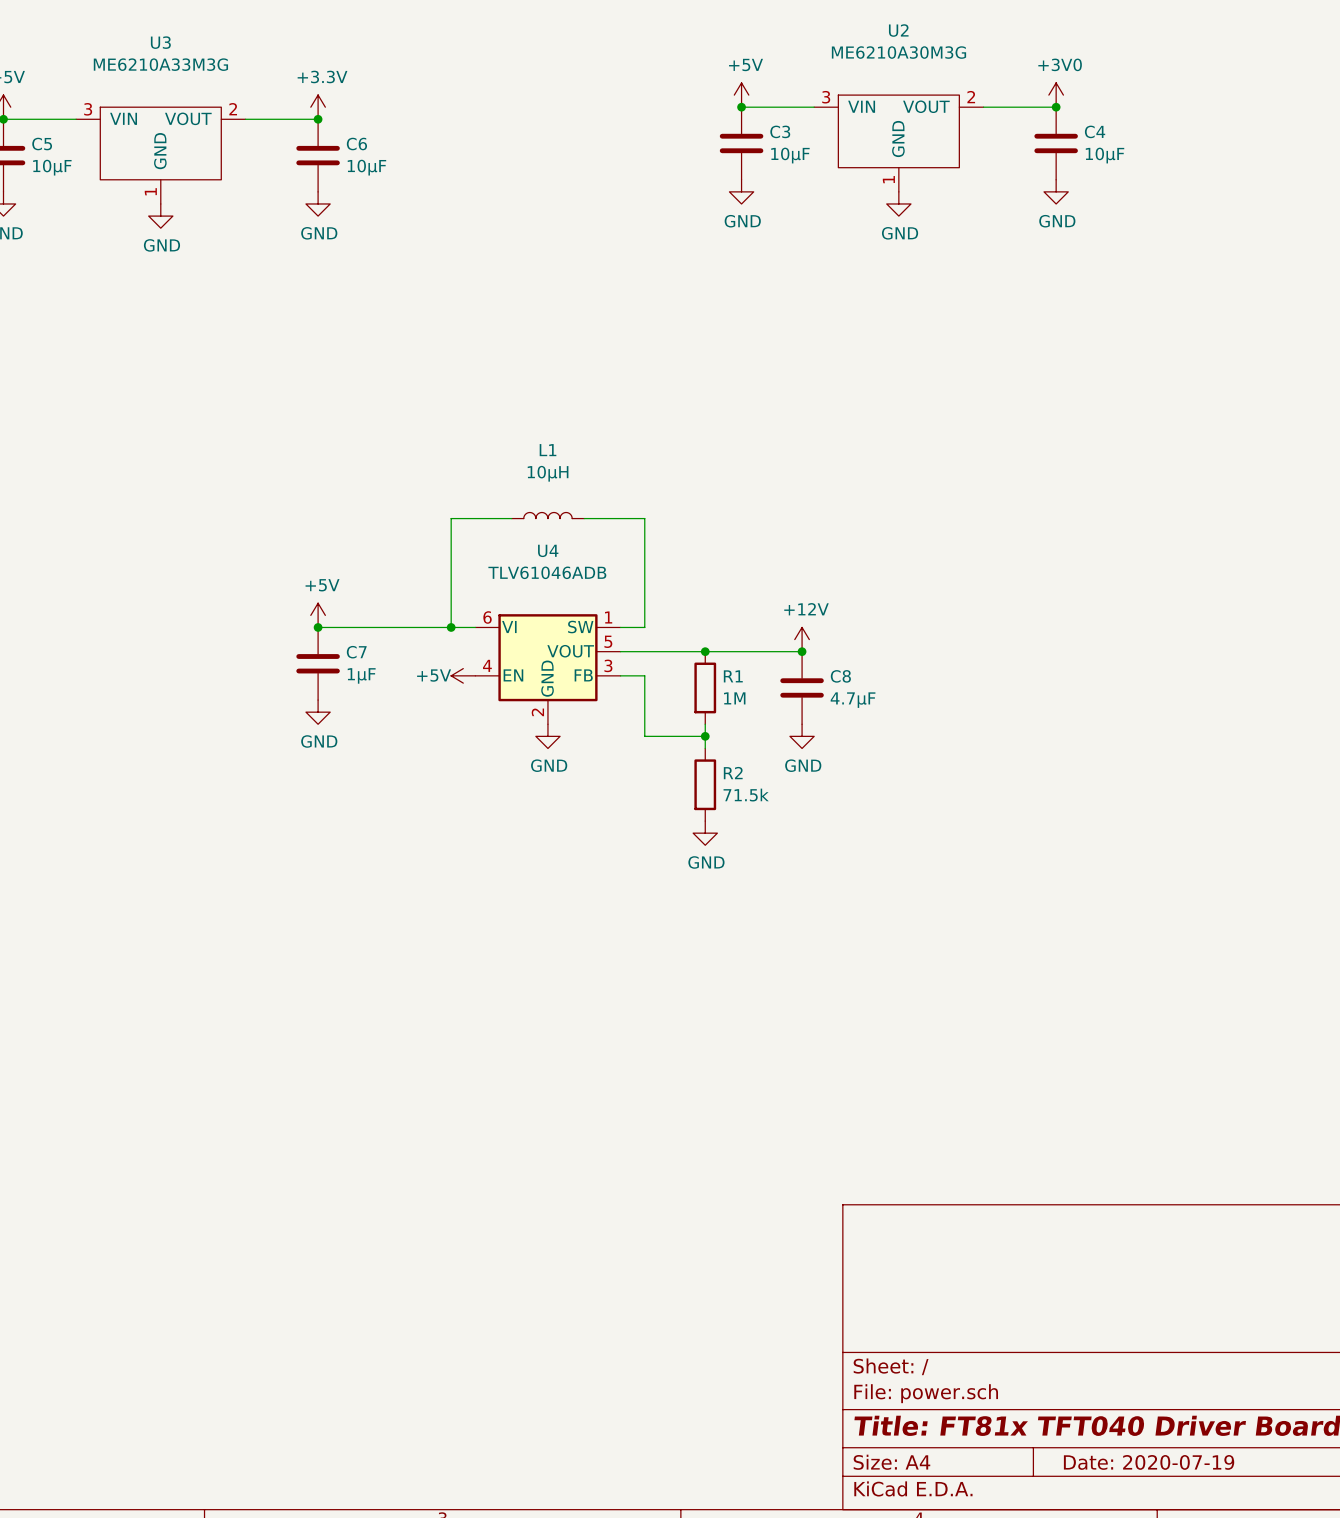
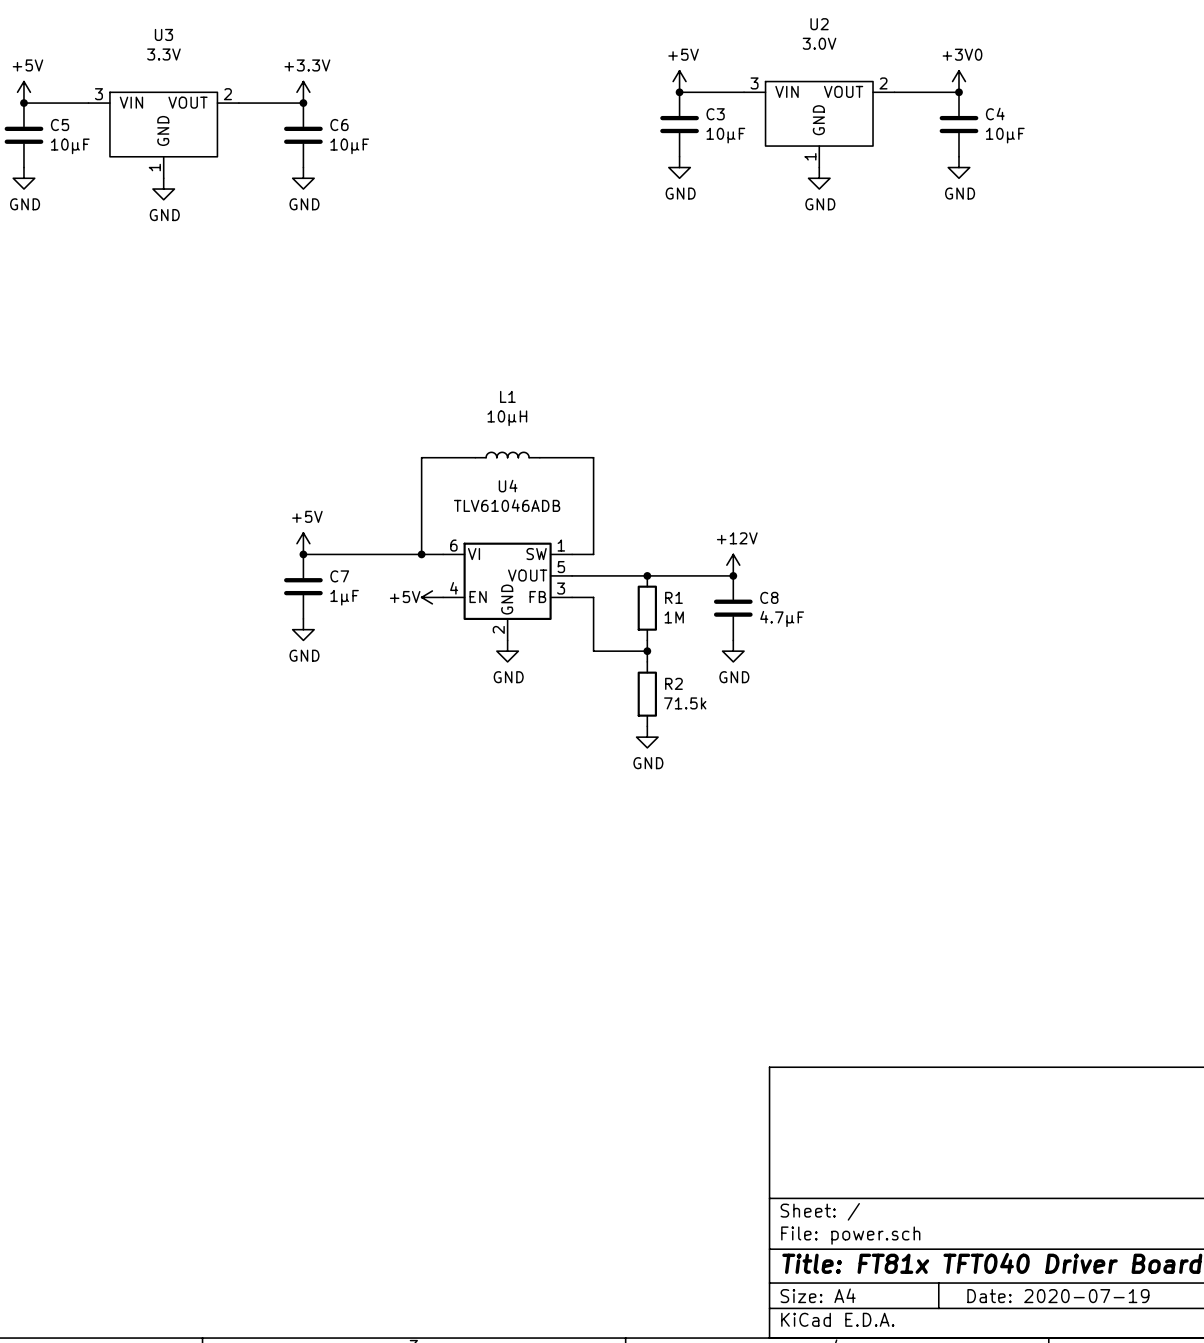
U2 value: ME6210A30M3G (898, 52) -> 3.0V (819, 43)
U3 value: ME6210A33M3G (160, 64) -> 3.3V (163, 54)

